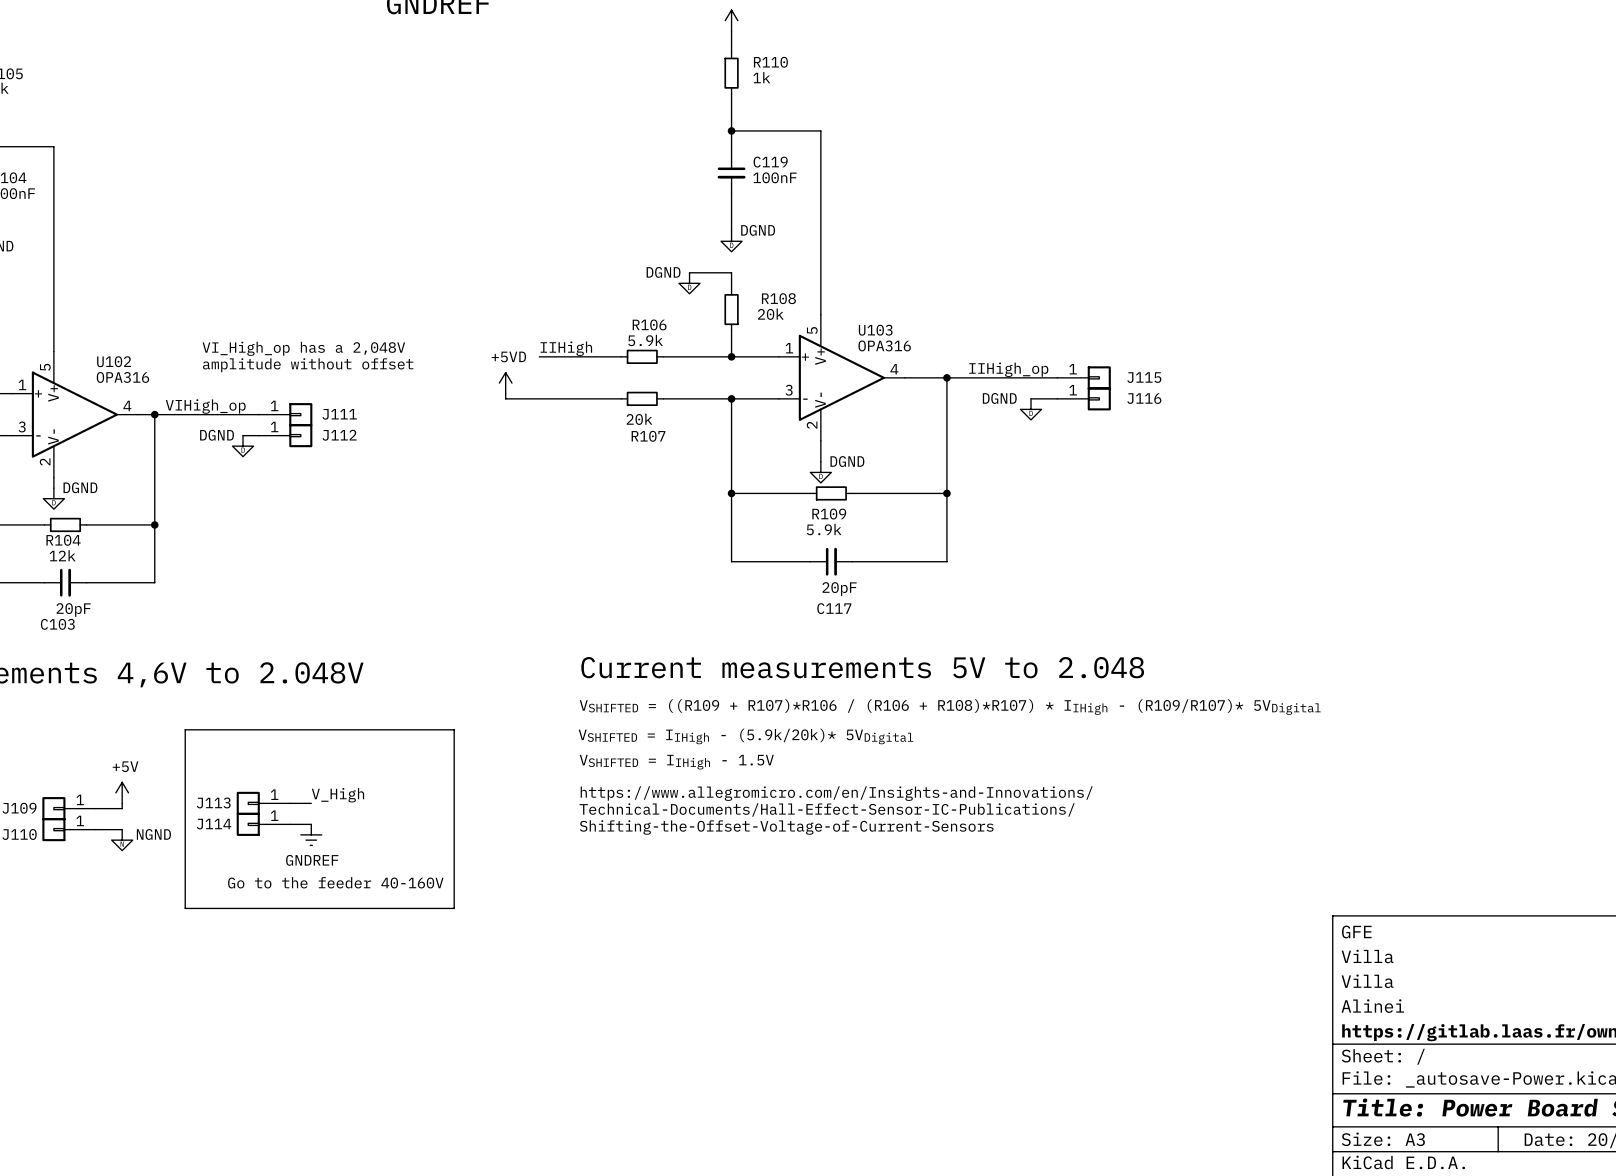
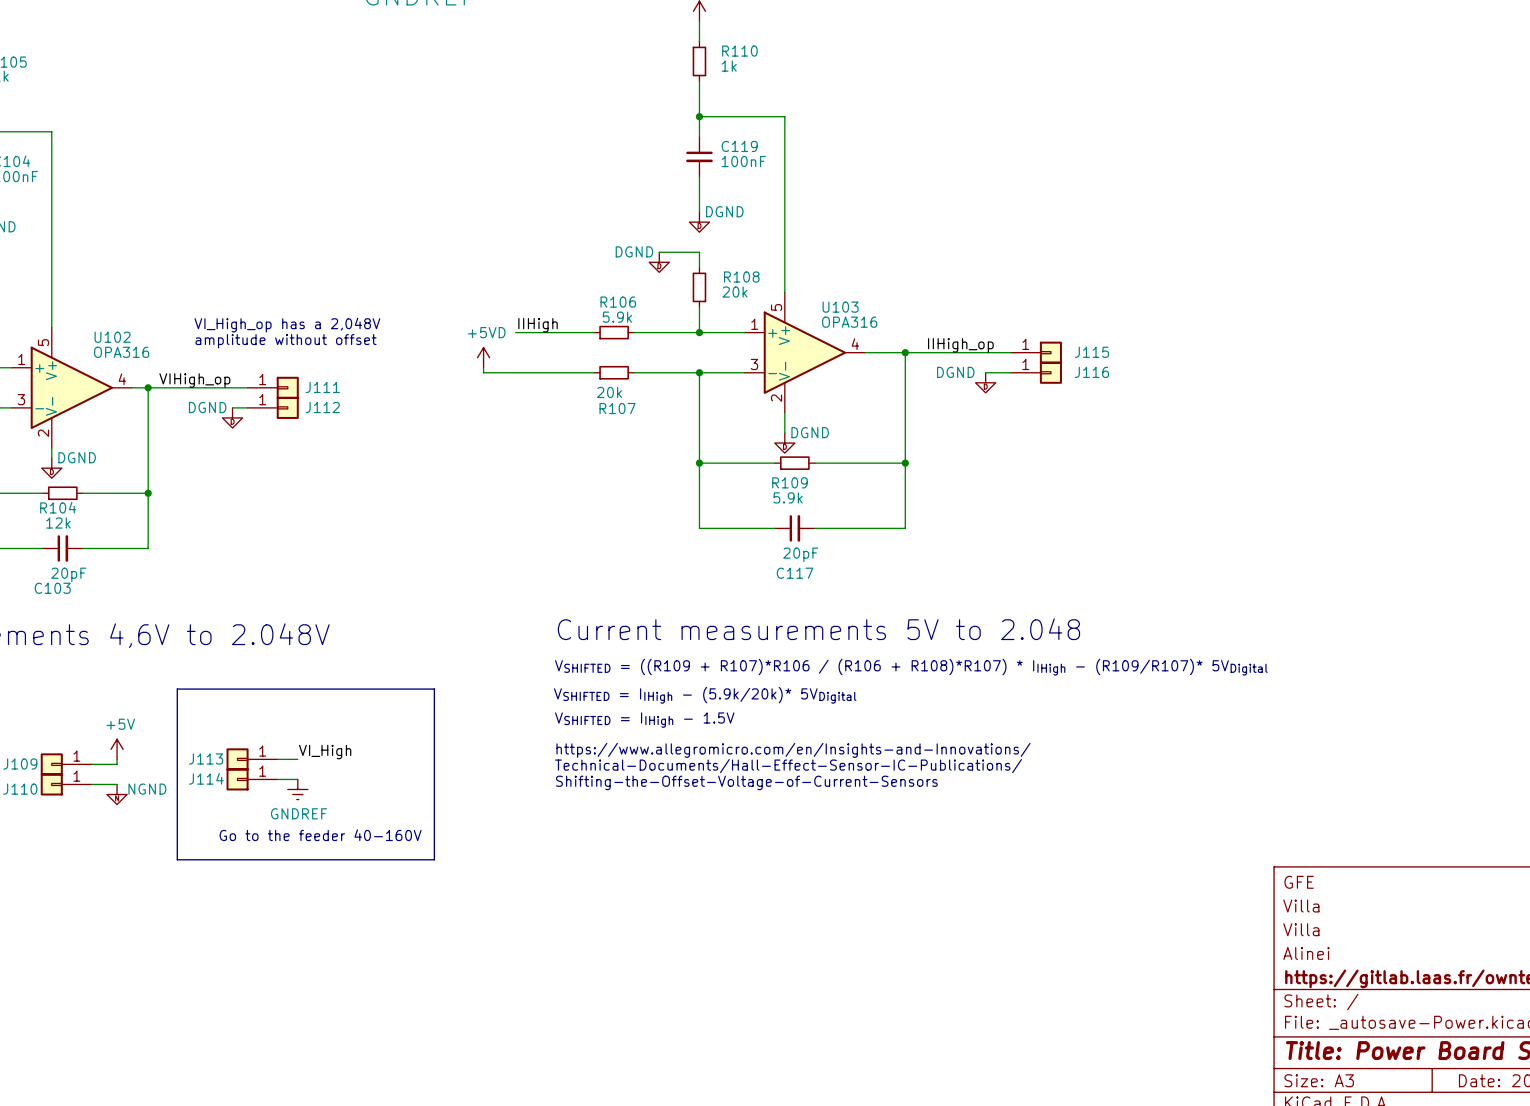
label: V_High (337, 795) -> VI_High (325, 752)

